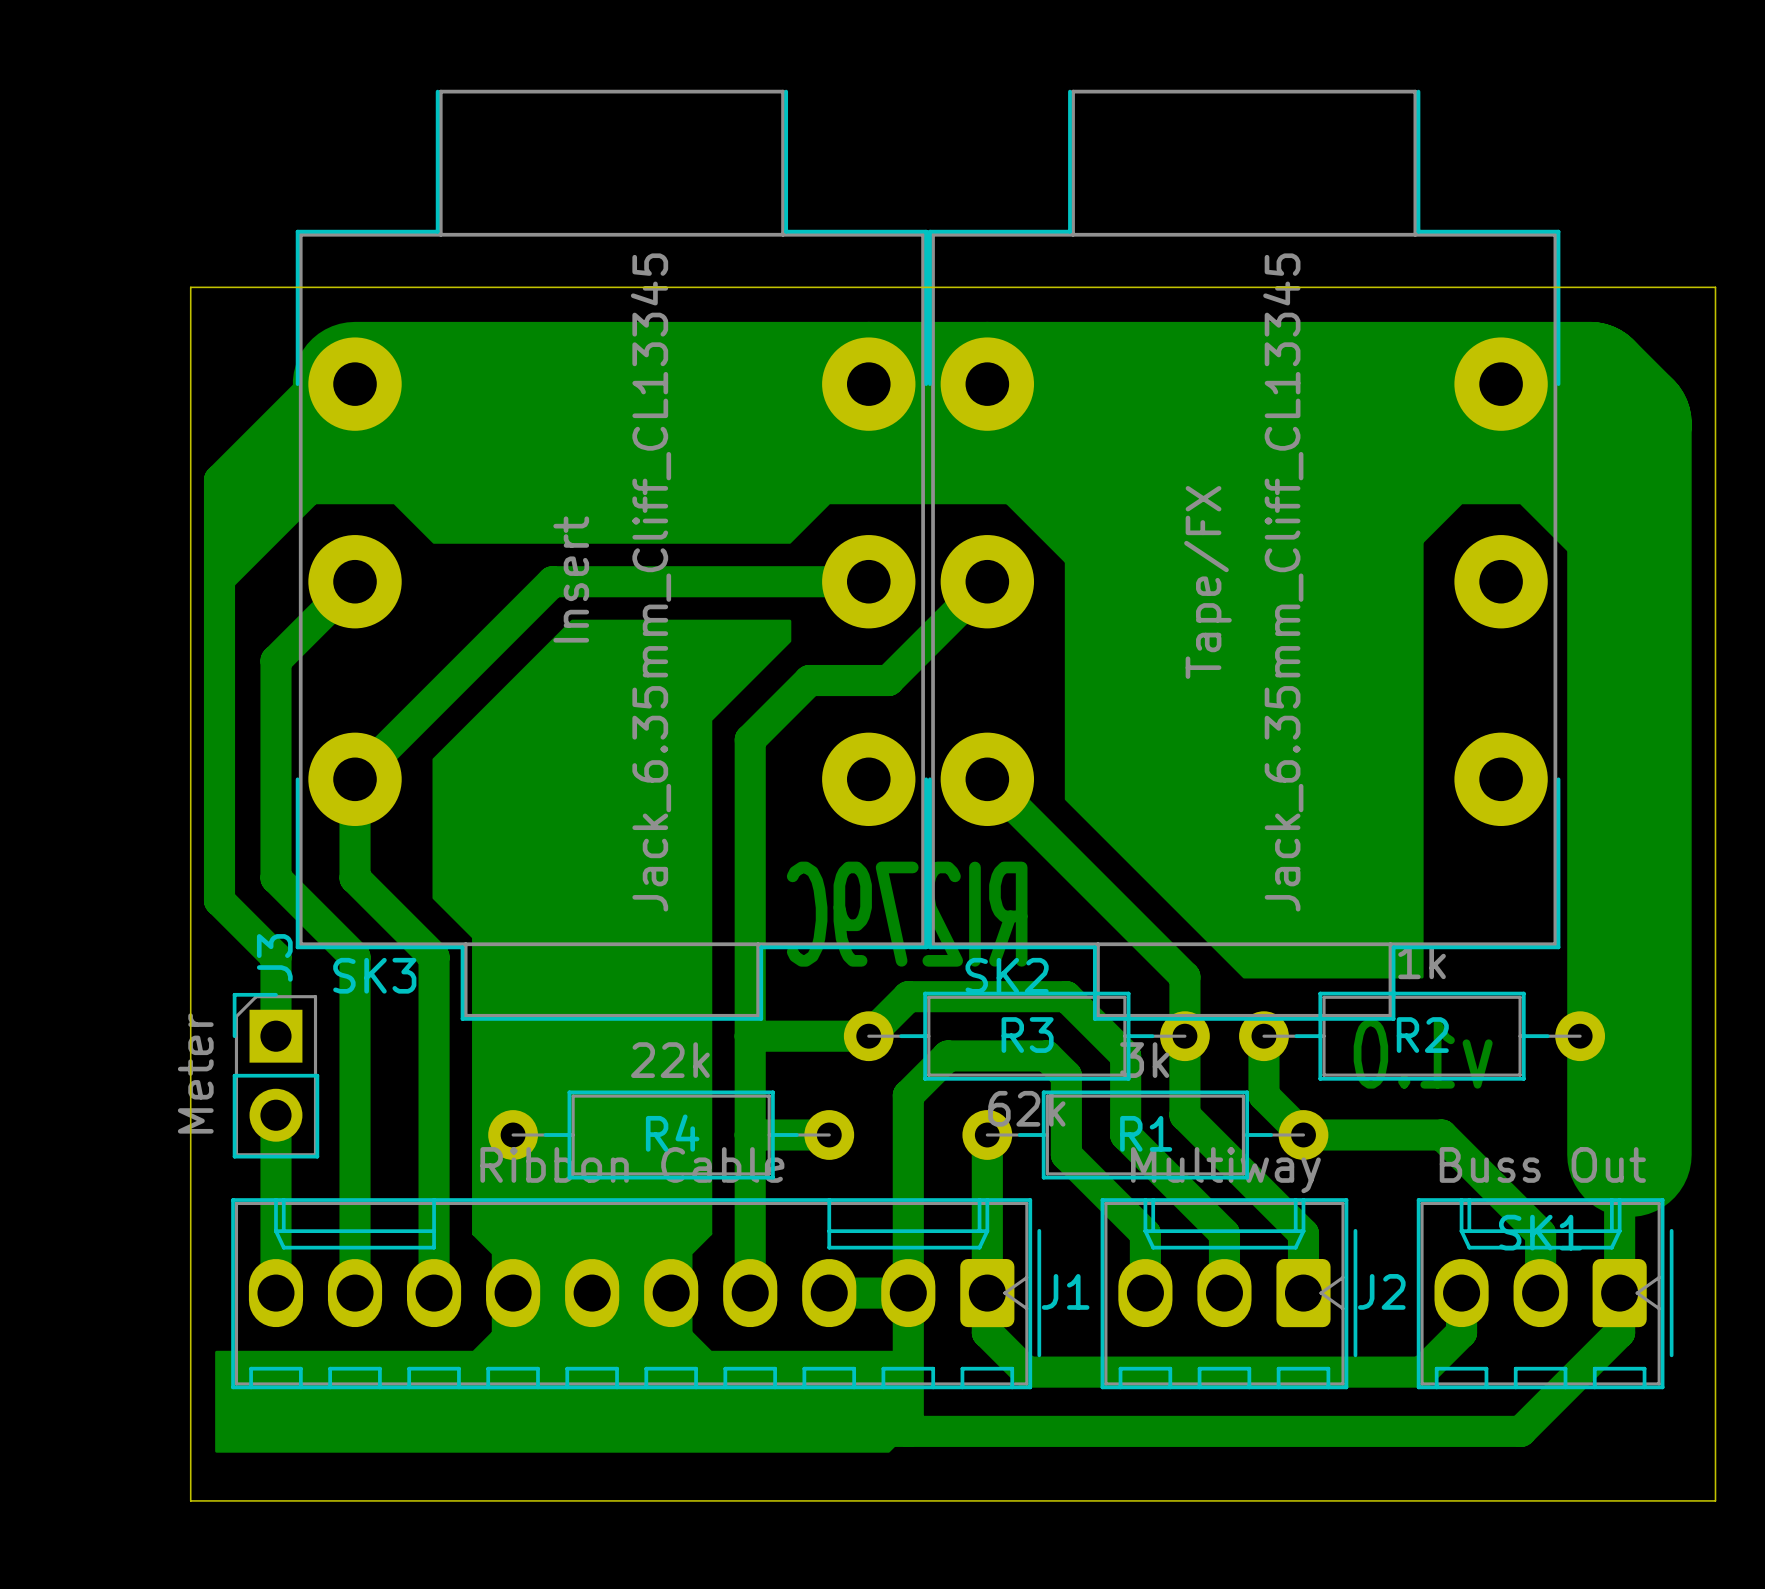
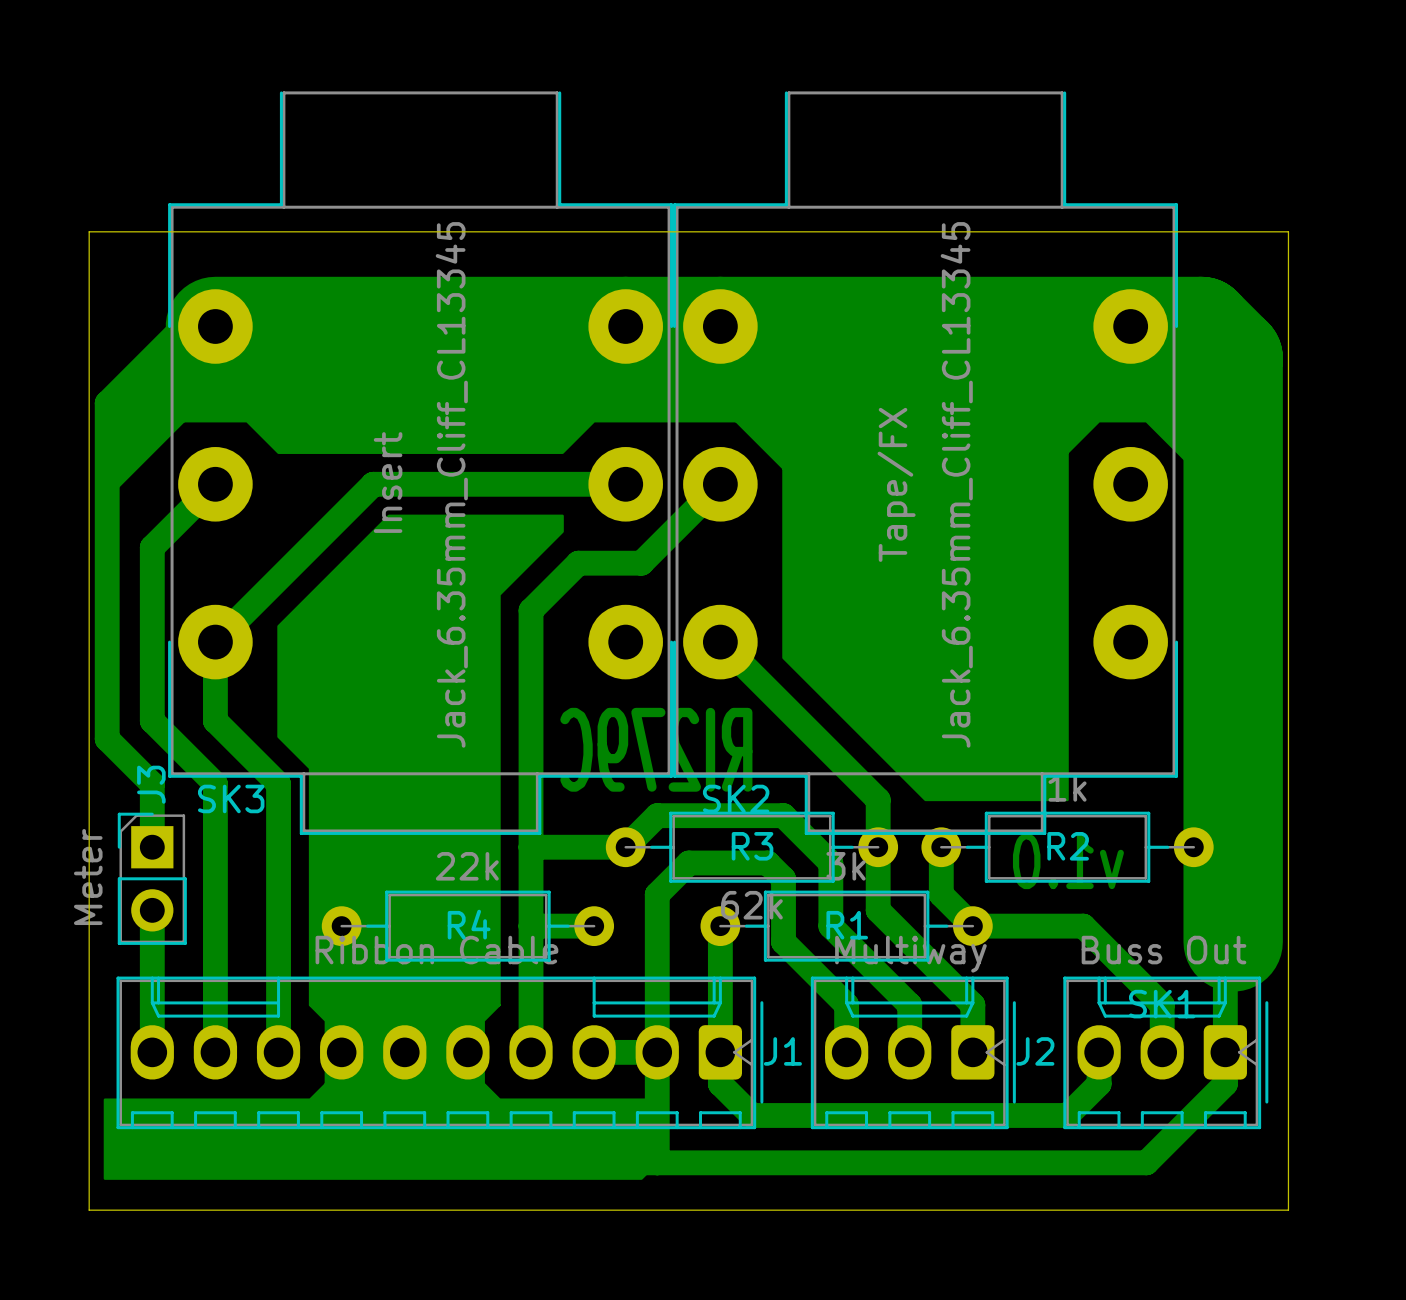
board edge: (190, 287) (190, 1500) (1715, 1500) (1715, 287) (190, 287) -> (89, 231) (89, 1210) (1288, 1210) (1288, 231) (89, 231)

